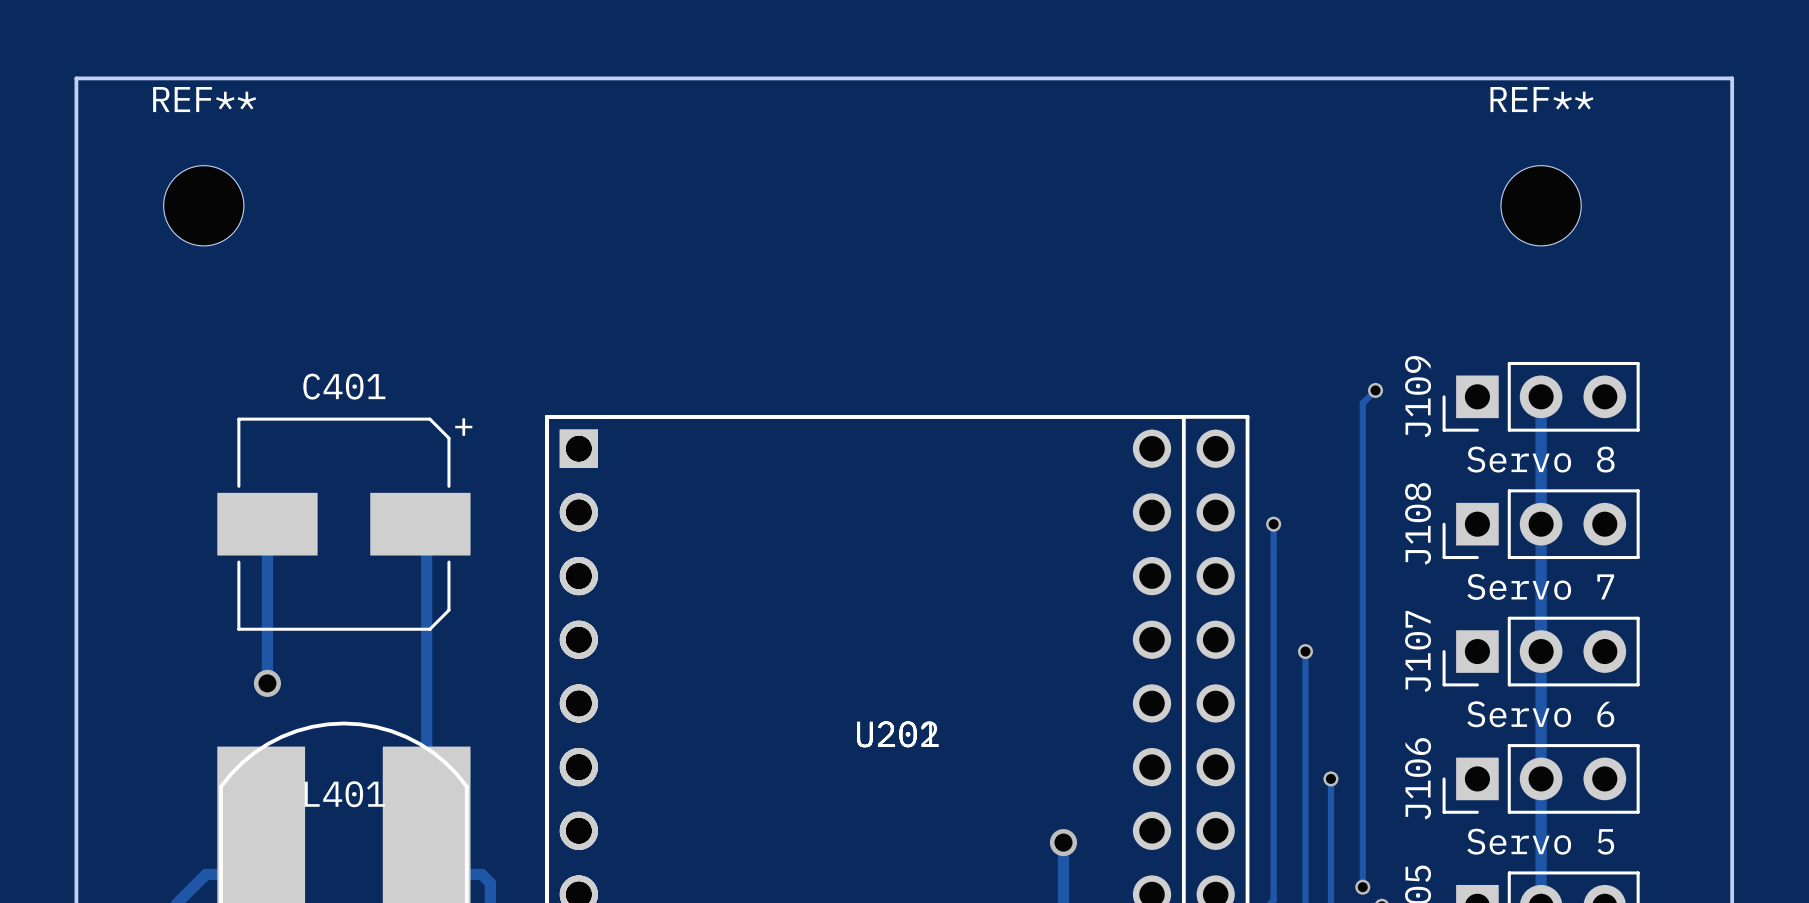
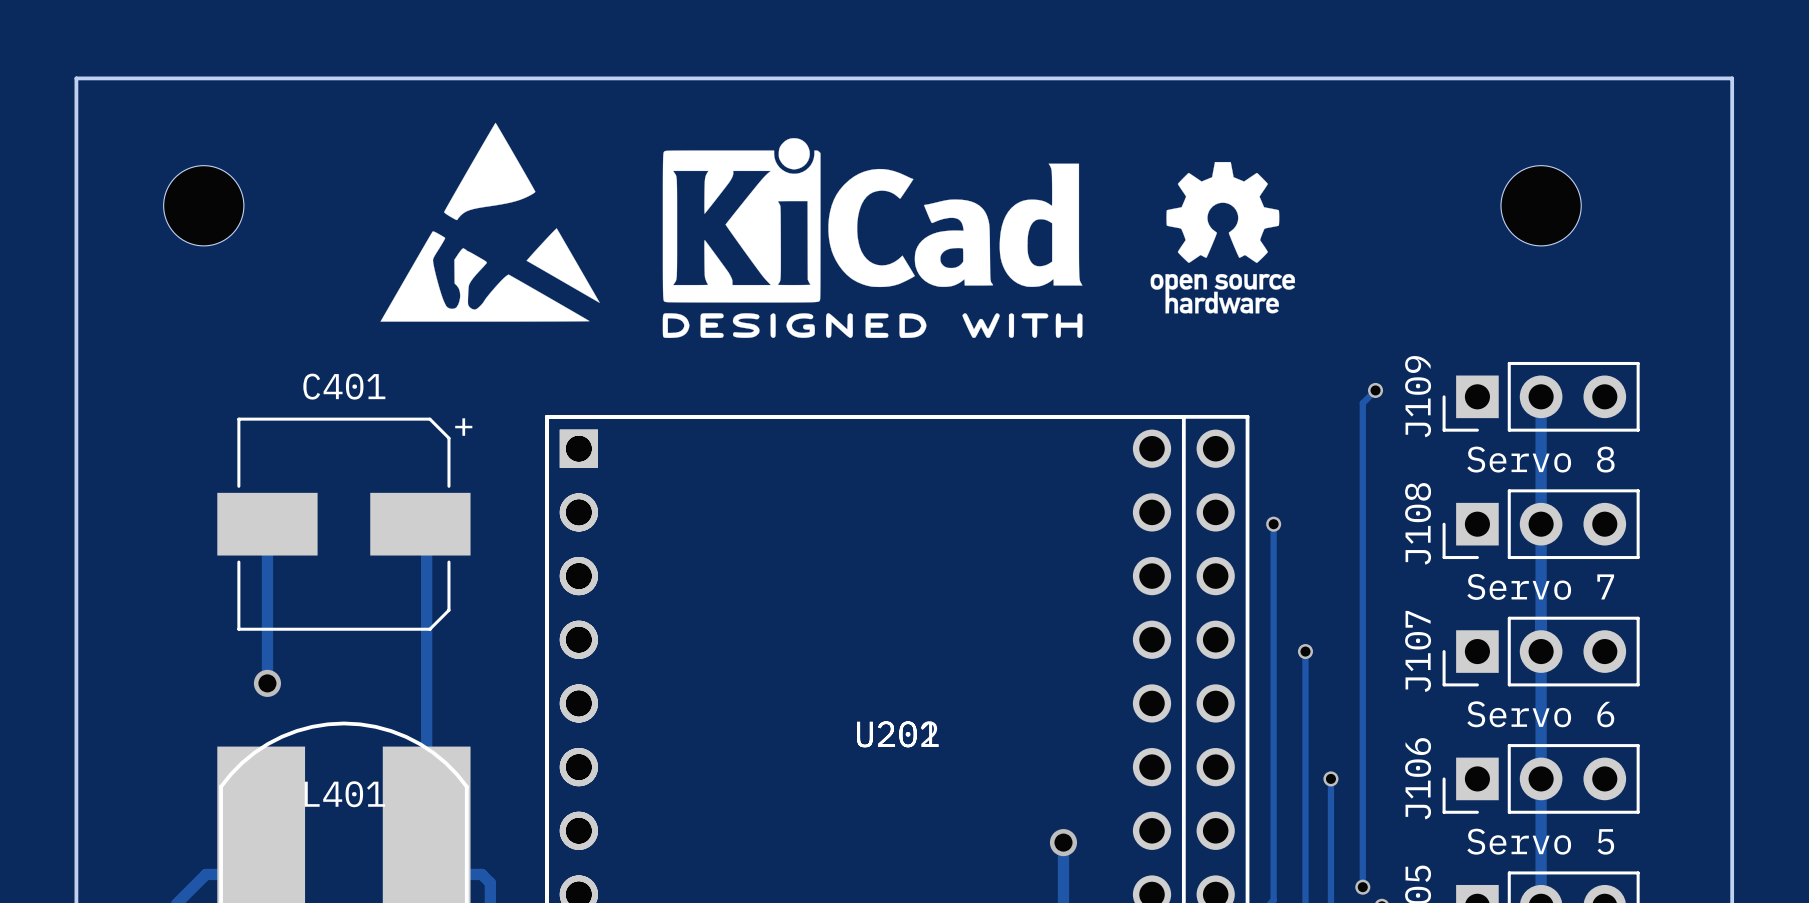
REF** name: REF** (204, 99) -> none
REF** name: REF** (1541, 99) -> none
drawing: none -> [380, 122, 600, 322]
drawing: none -> [662, 138, 1083, 338]
drawing: none -> [1150, 161, 1296, 314]

